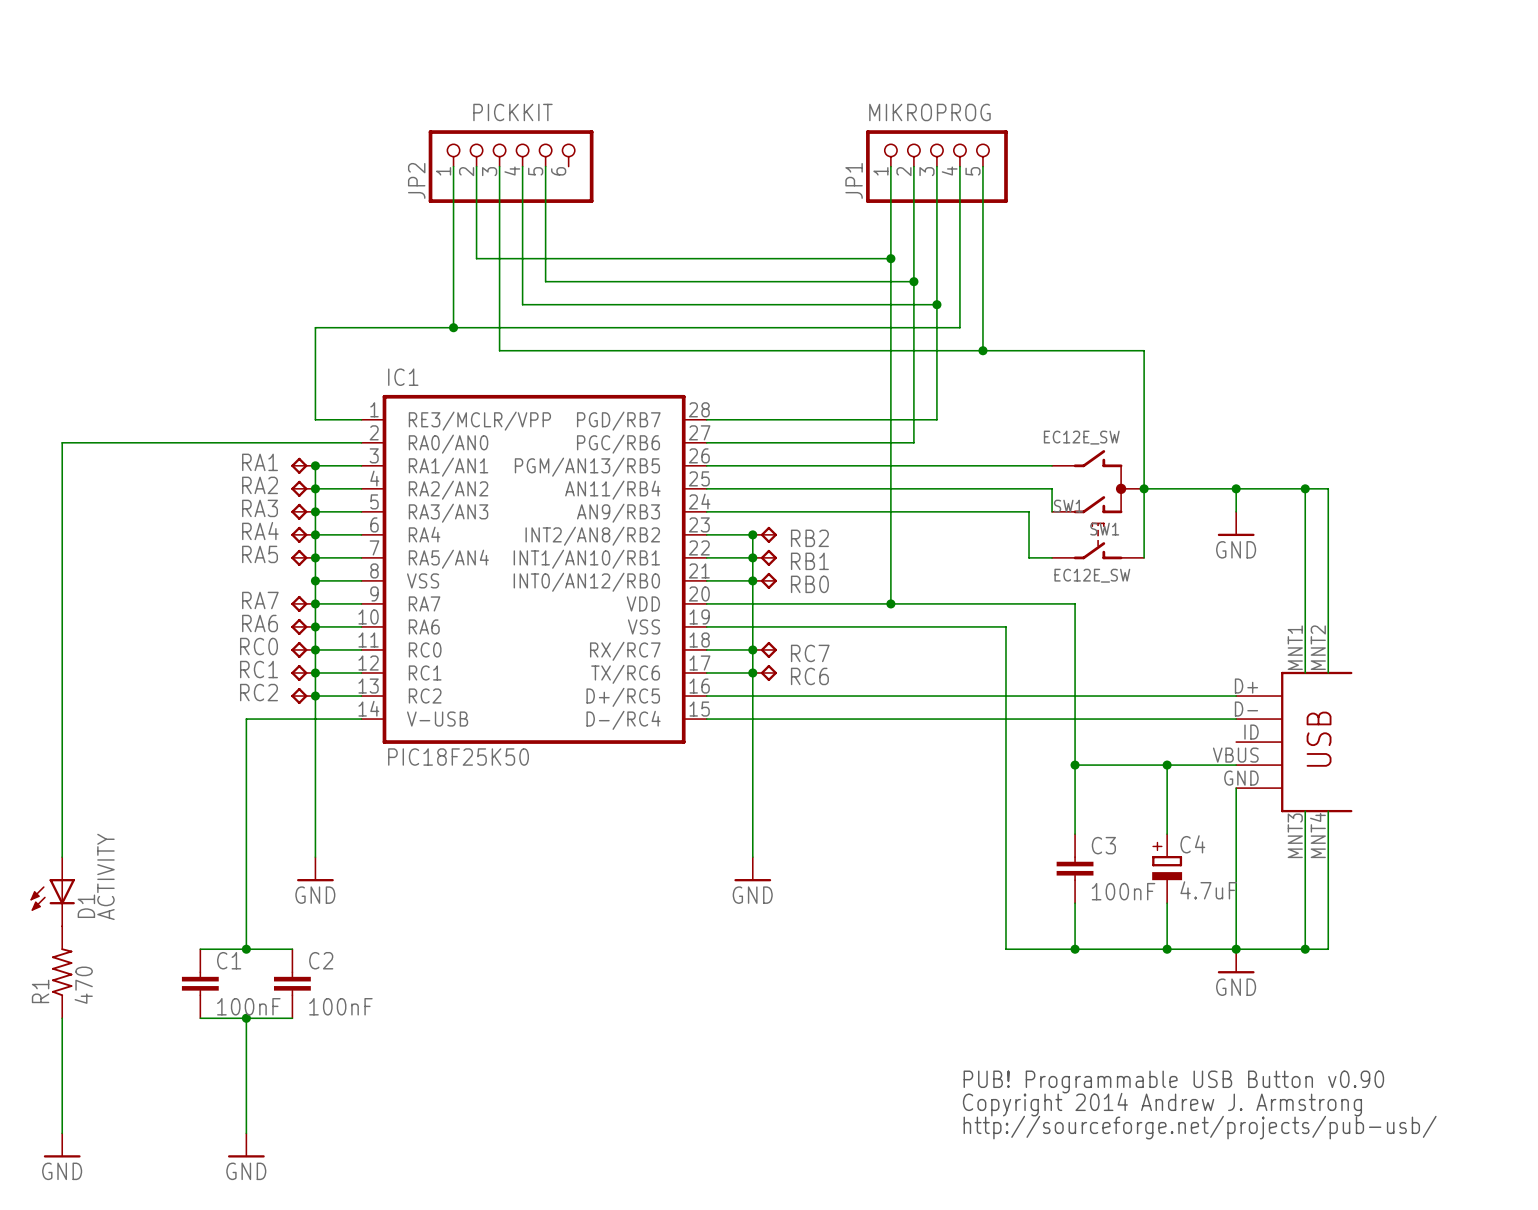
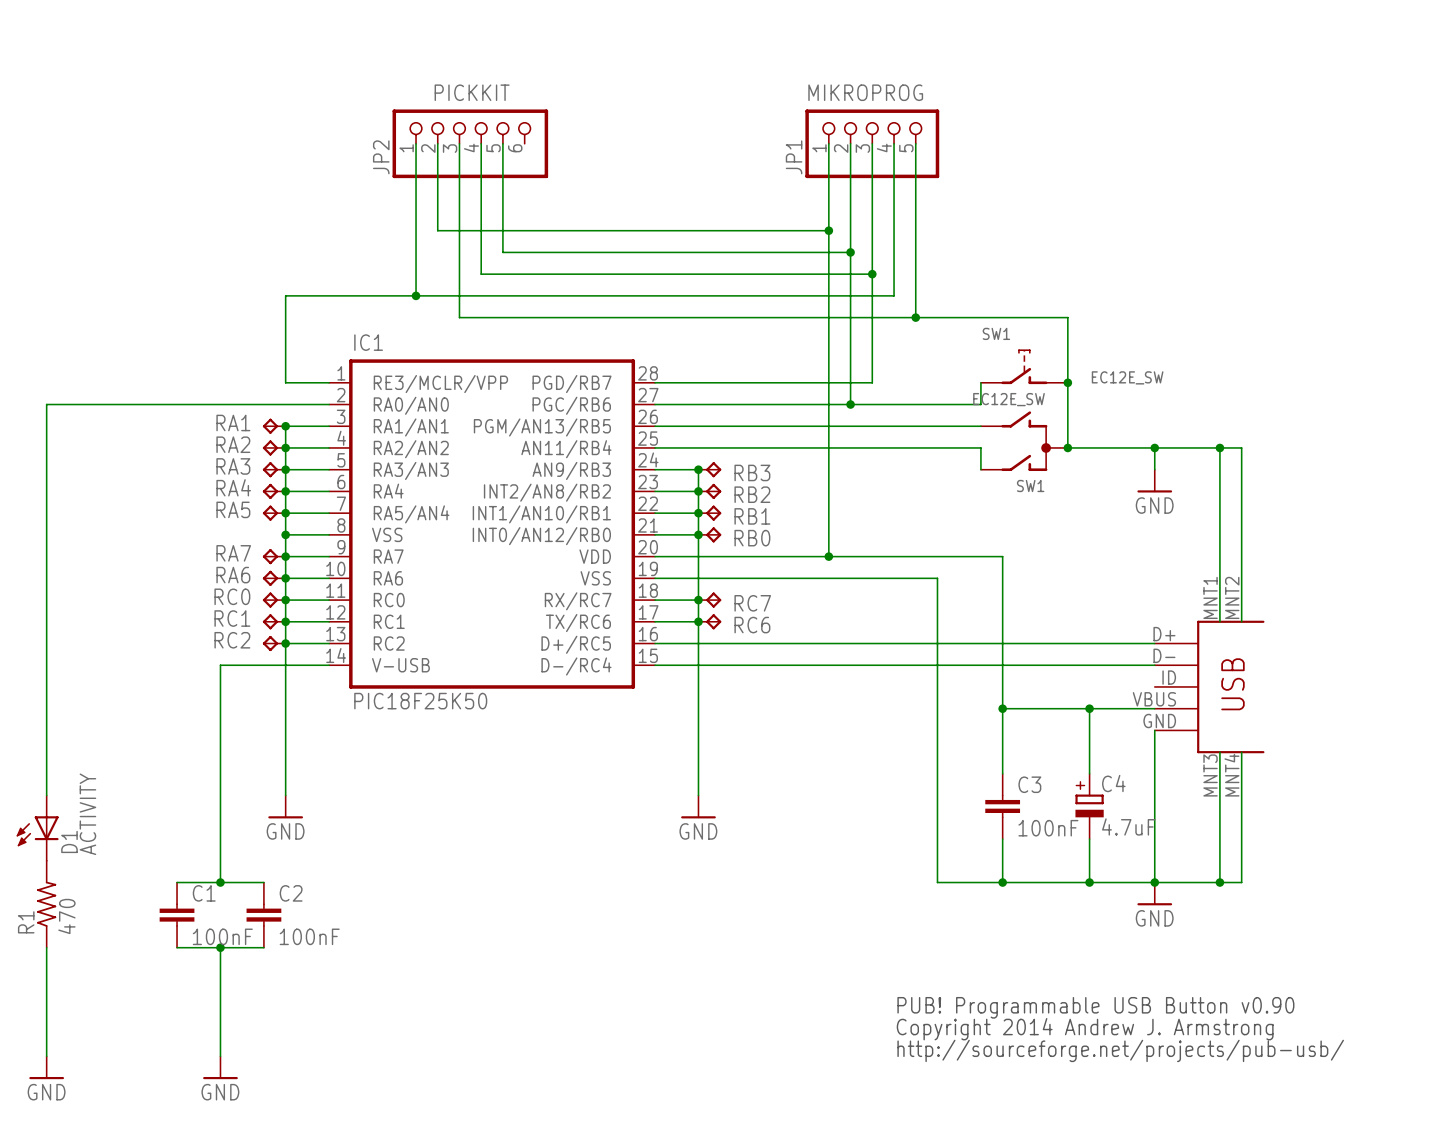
wire: none -> (980, 382) (980, 404) (850, 404)
junction: none -> (1067, 382)
junction: none -> (850, 404)
wire: (1144, 488) (1144, 557) -> none
wire: (752, 511) (1029, 511) (1029, 557) (1052, 557) -> (698, 469) (698, 491)
junction: none -> (698, 469)
RB3: none -> (709, 469)
SW1 position: (1098, 541) -> (1024, 366)
SW1 value position: EC12E_SW (1092, 575) -> EC12E_SW (1127, 377)

